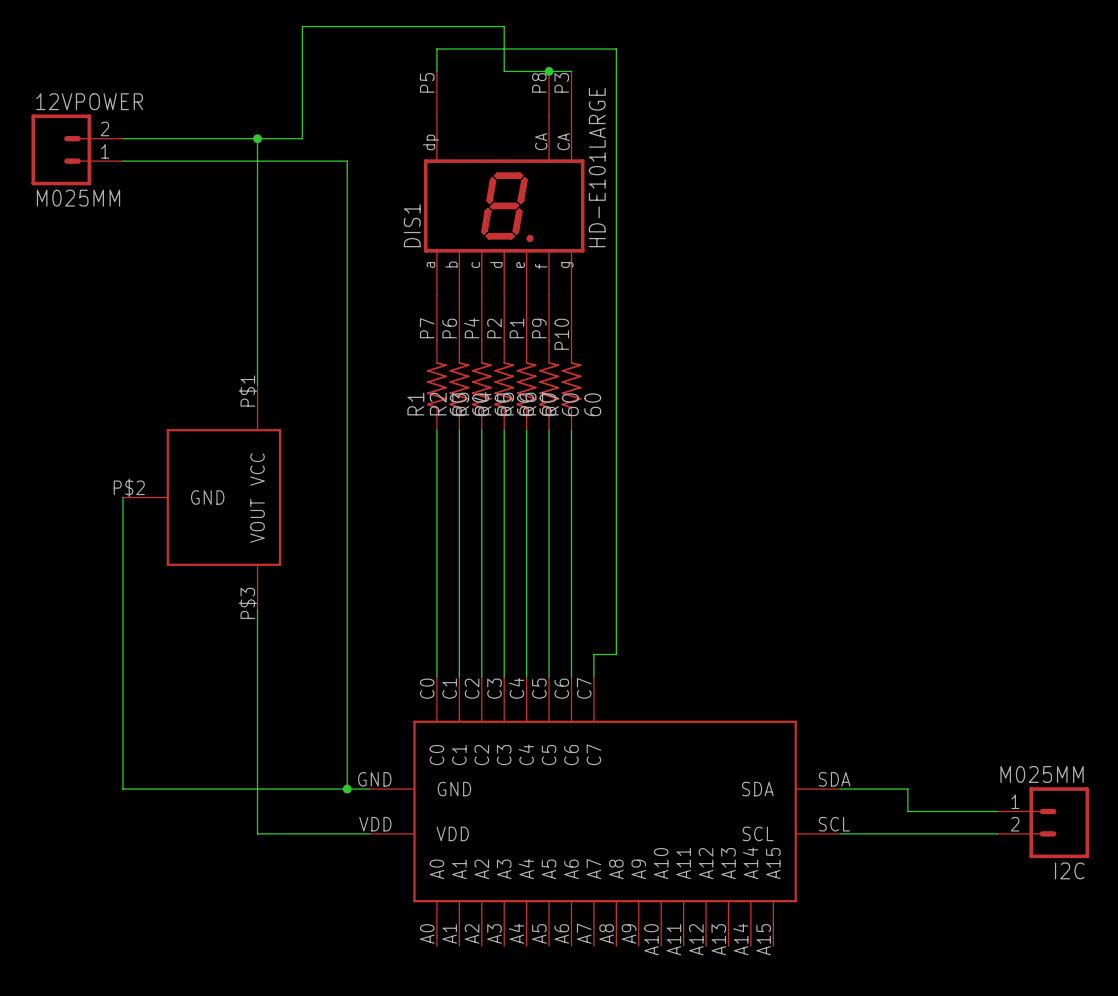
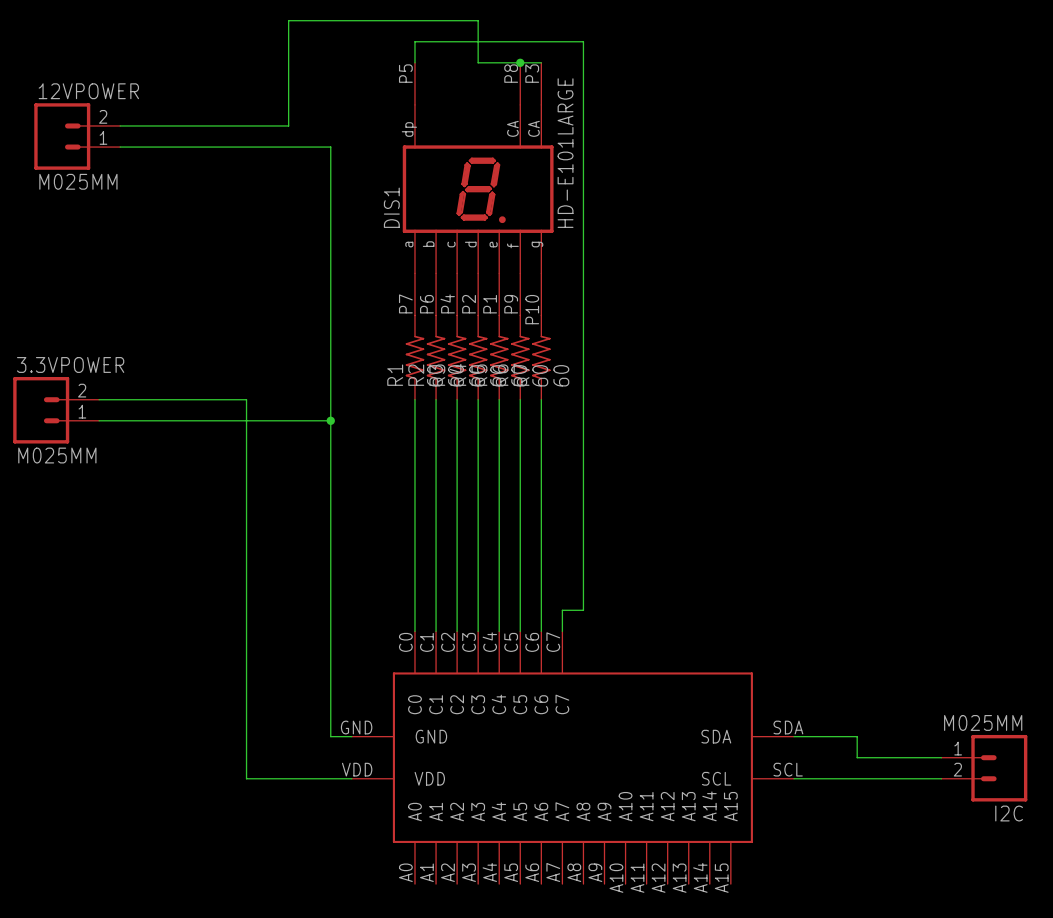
wire: (257, 138) (257, 385) -> none
junction: (257, 138) -> none
wire: none -> (99, 399) (246, 399) (246, 568)
3.3VPOWER: none -> M025MM (56, 410)
wire: none -> (99, 420) (330, 420)
junction: none -> (330, 420)
wire: (122, 497) (122, 789) (347, 789) -> none
part: (202, 497) -> none
junction: (347, 789) -> none

